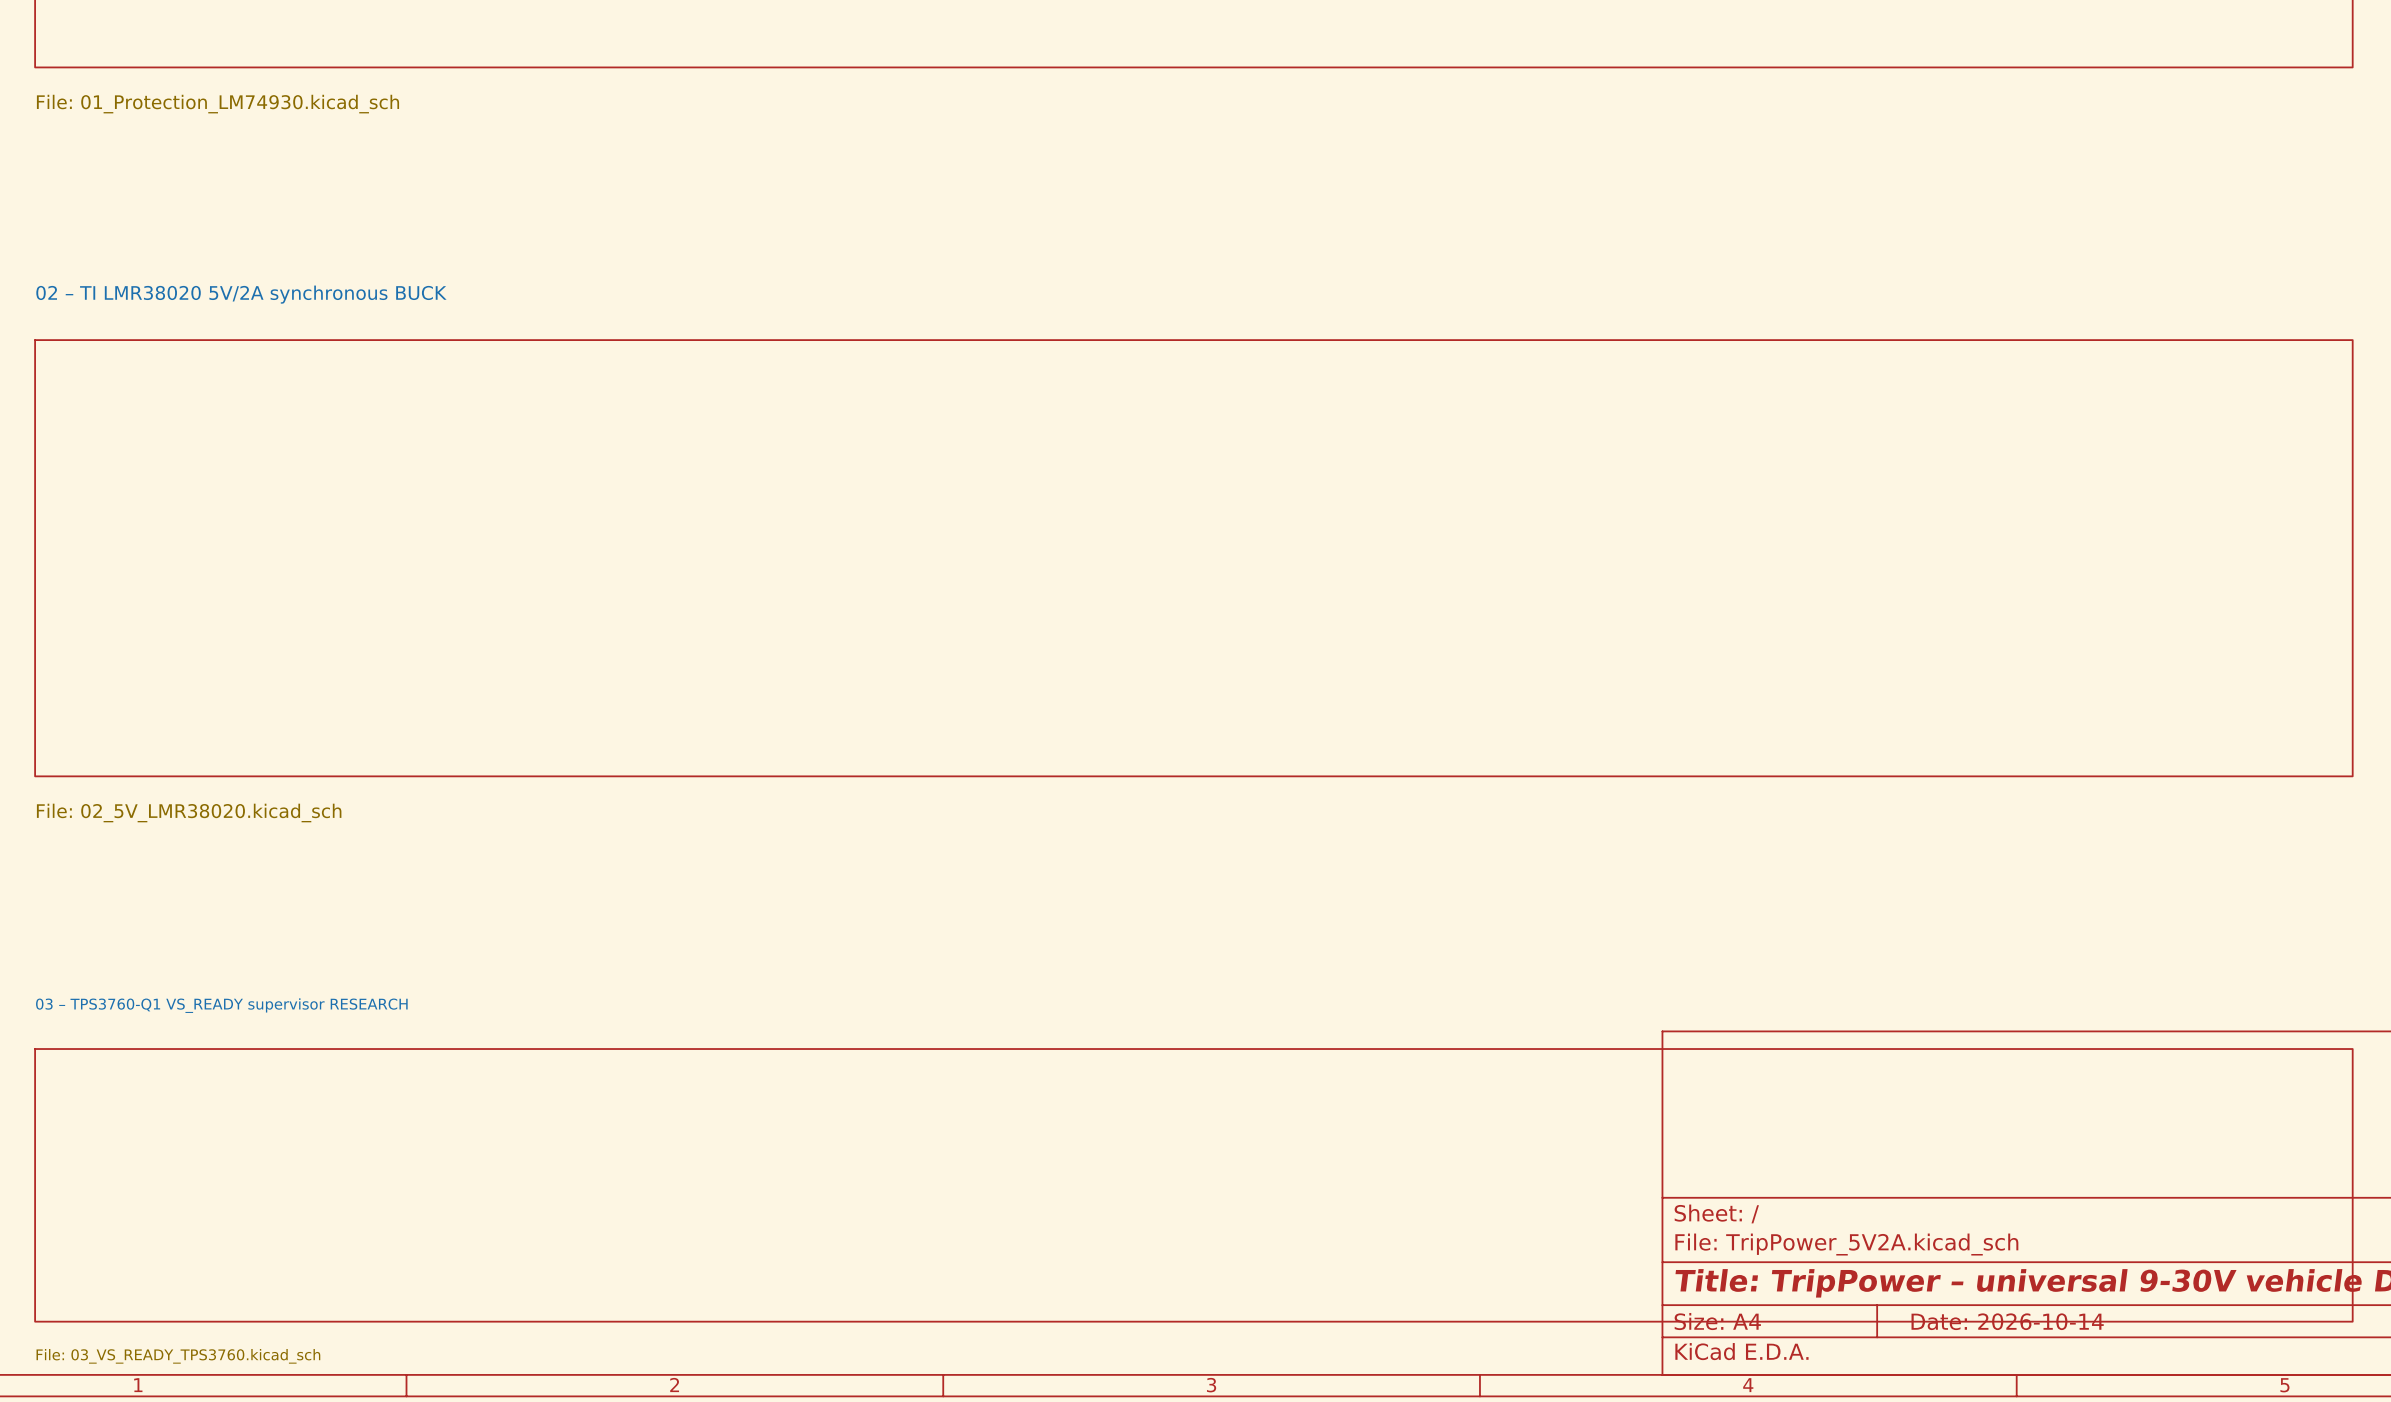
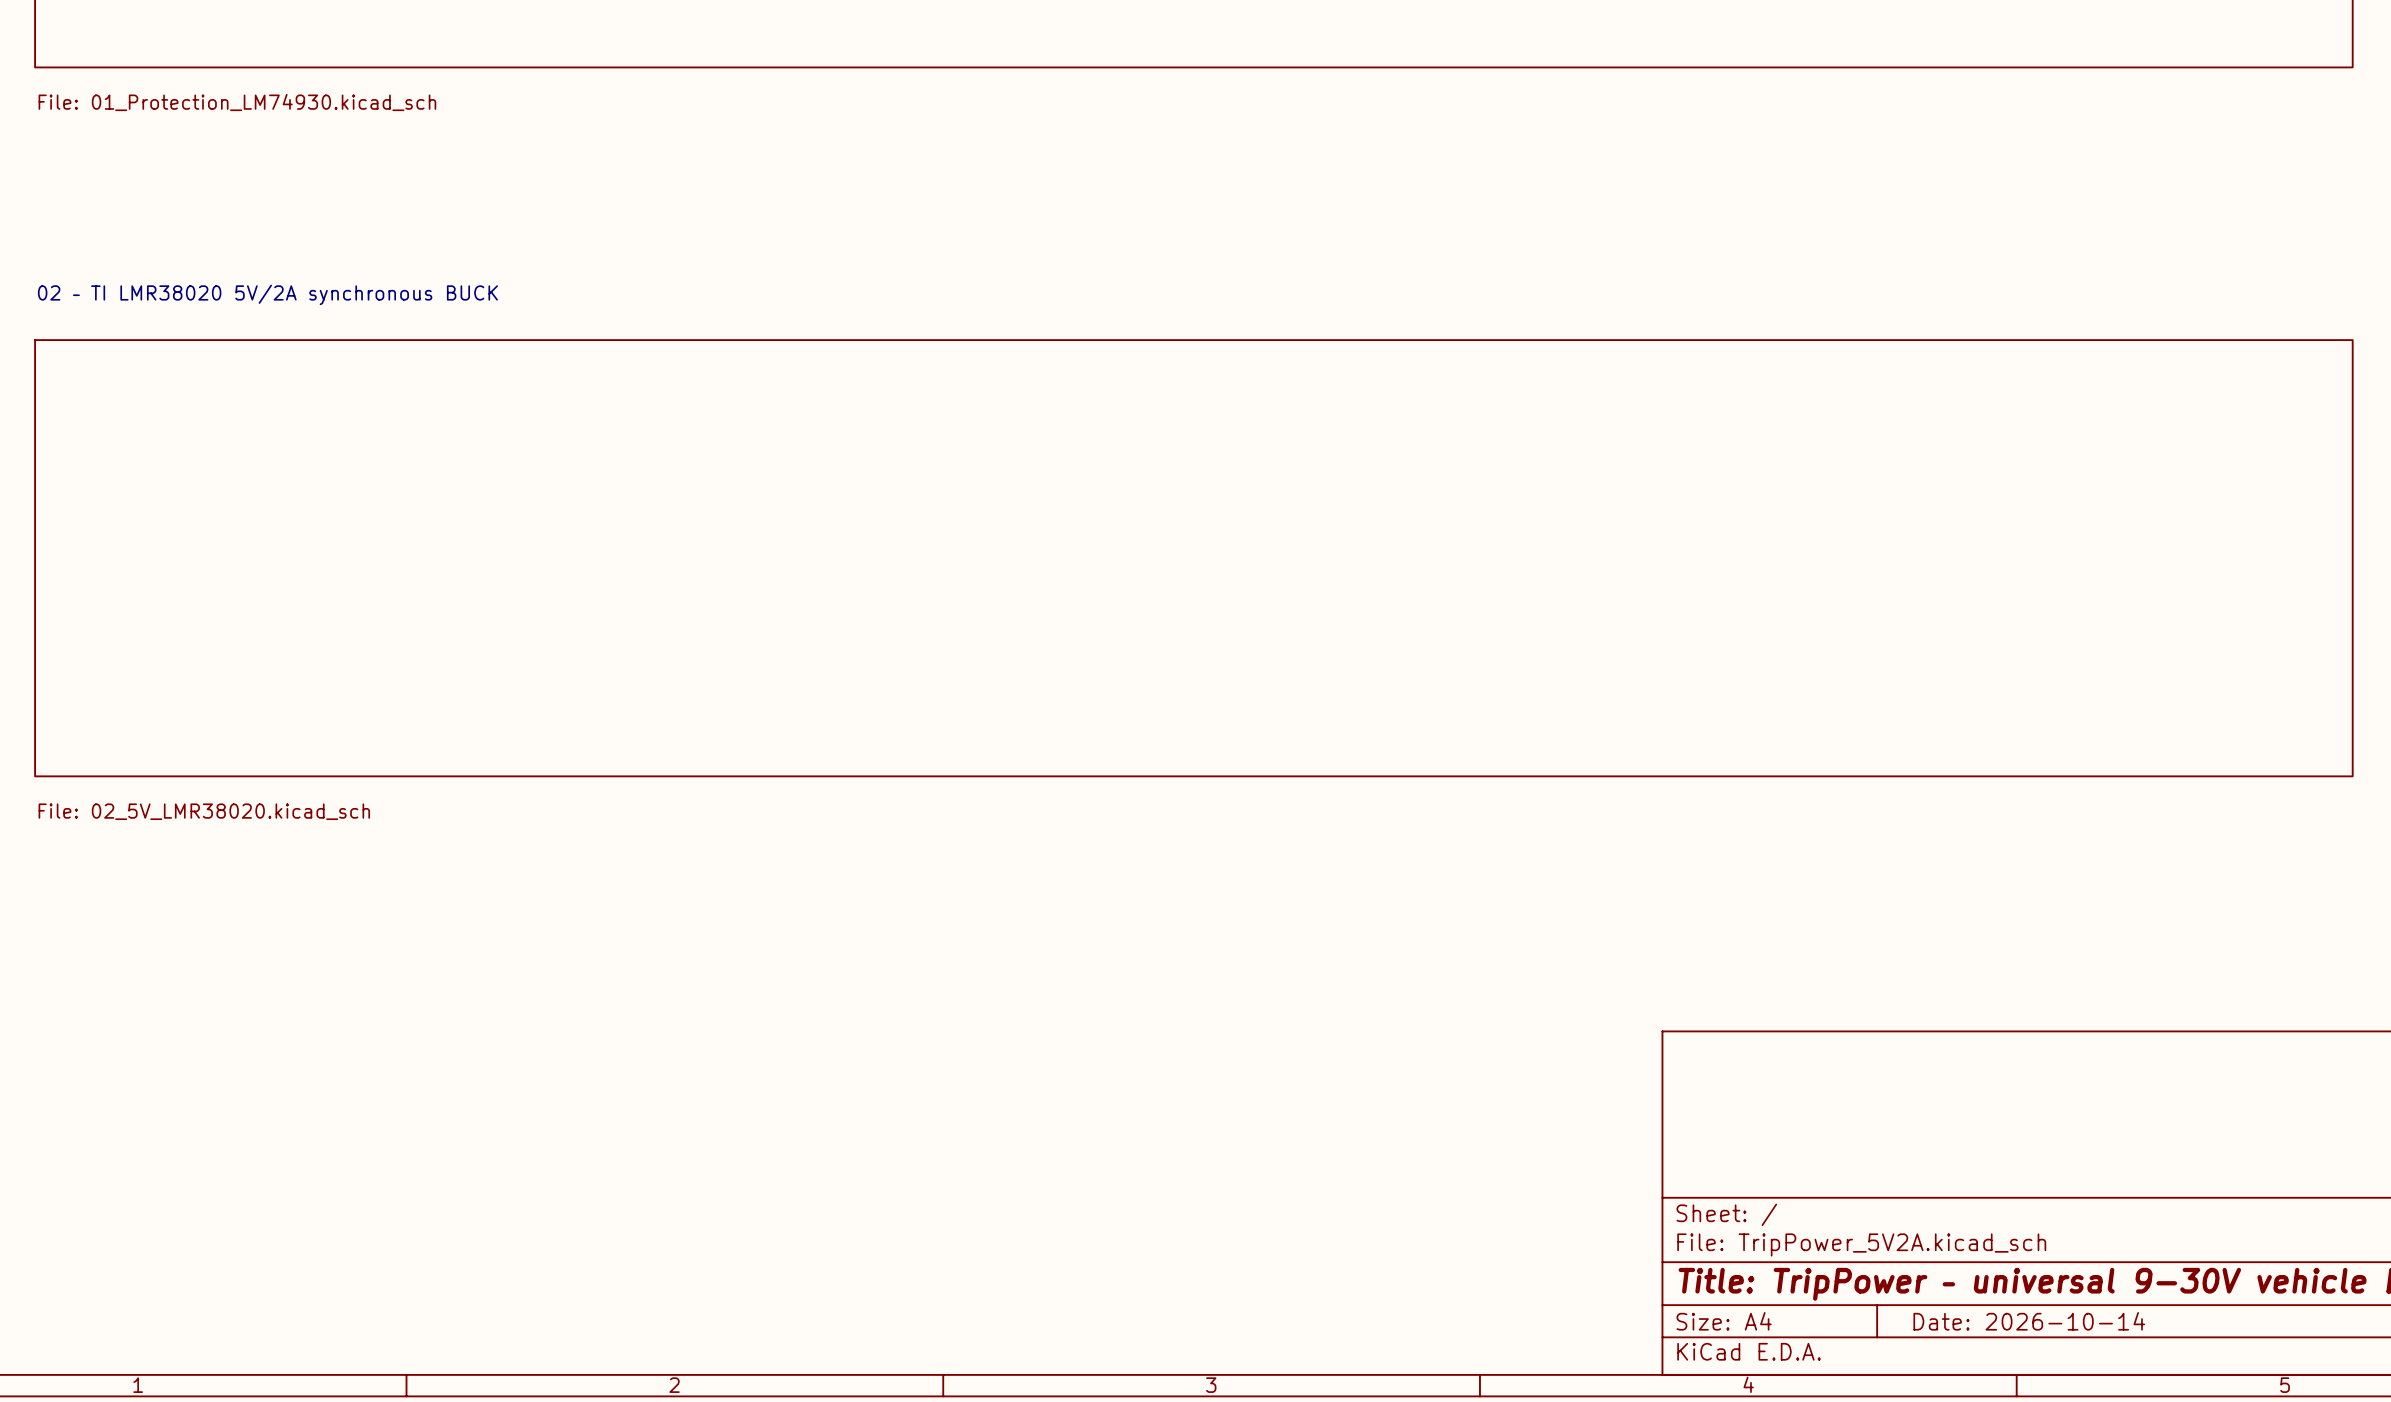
sheet 03 – TPS3760-Q1 VS_READY supervisor RESEARCH: File: 03_VS_READY_TPS3760.kicad_sch (1193, 1185) -> none

